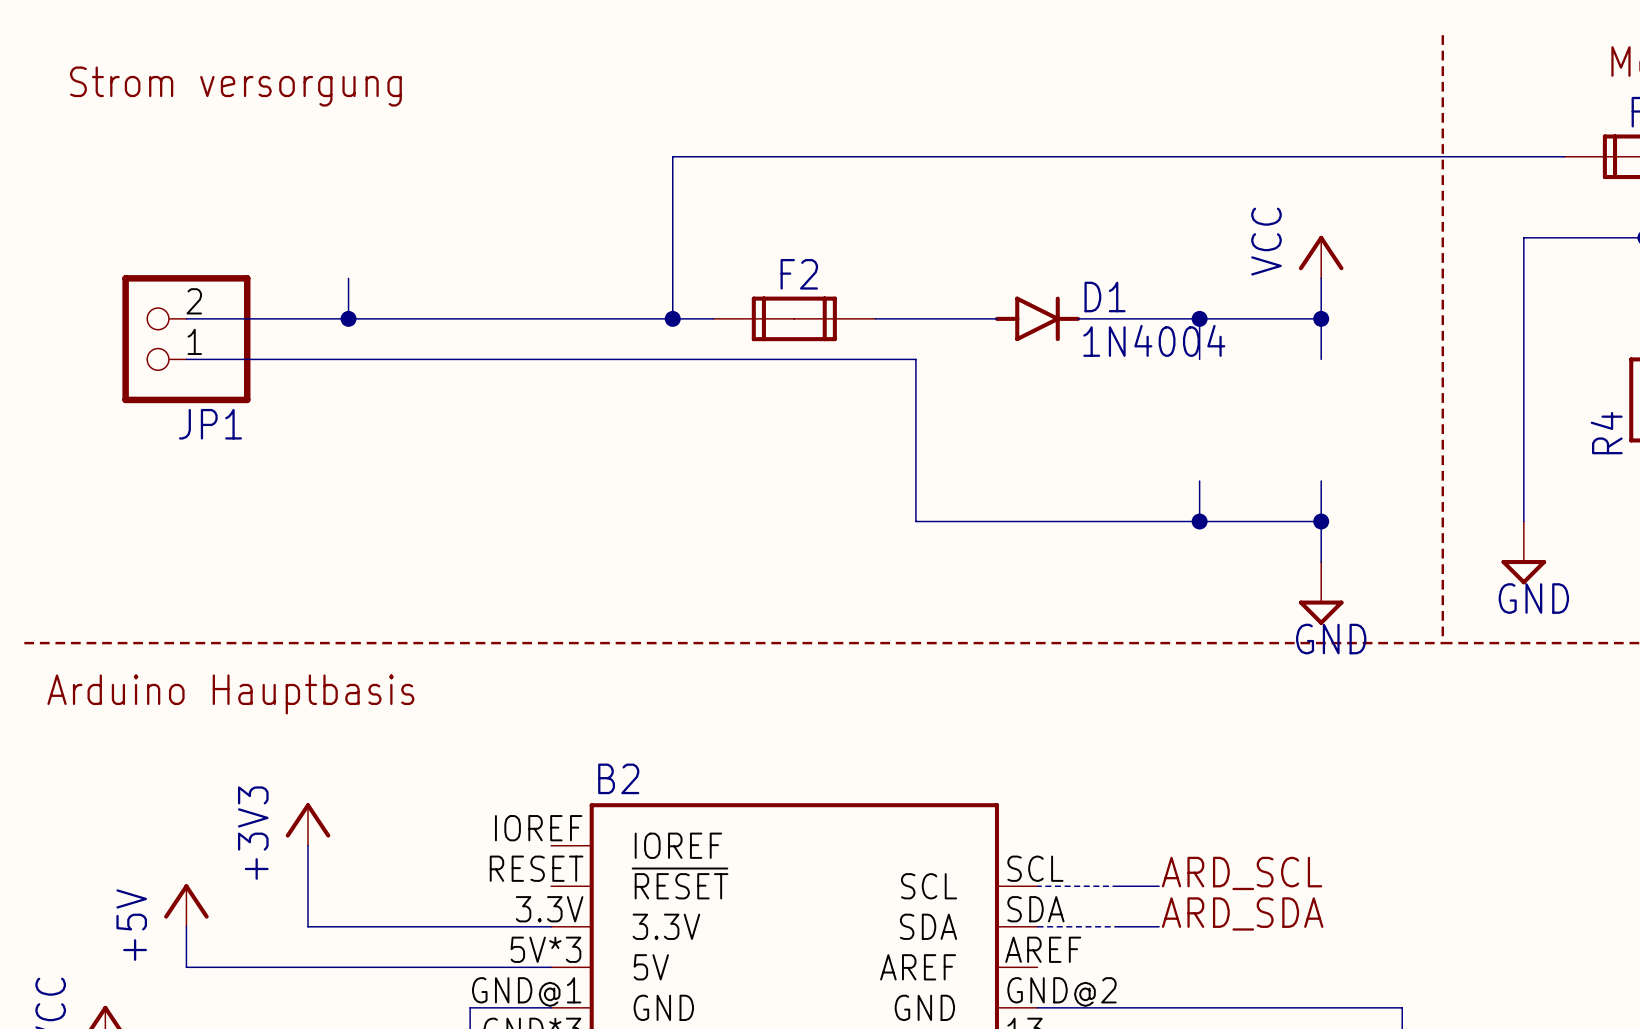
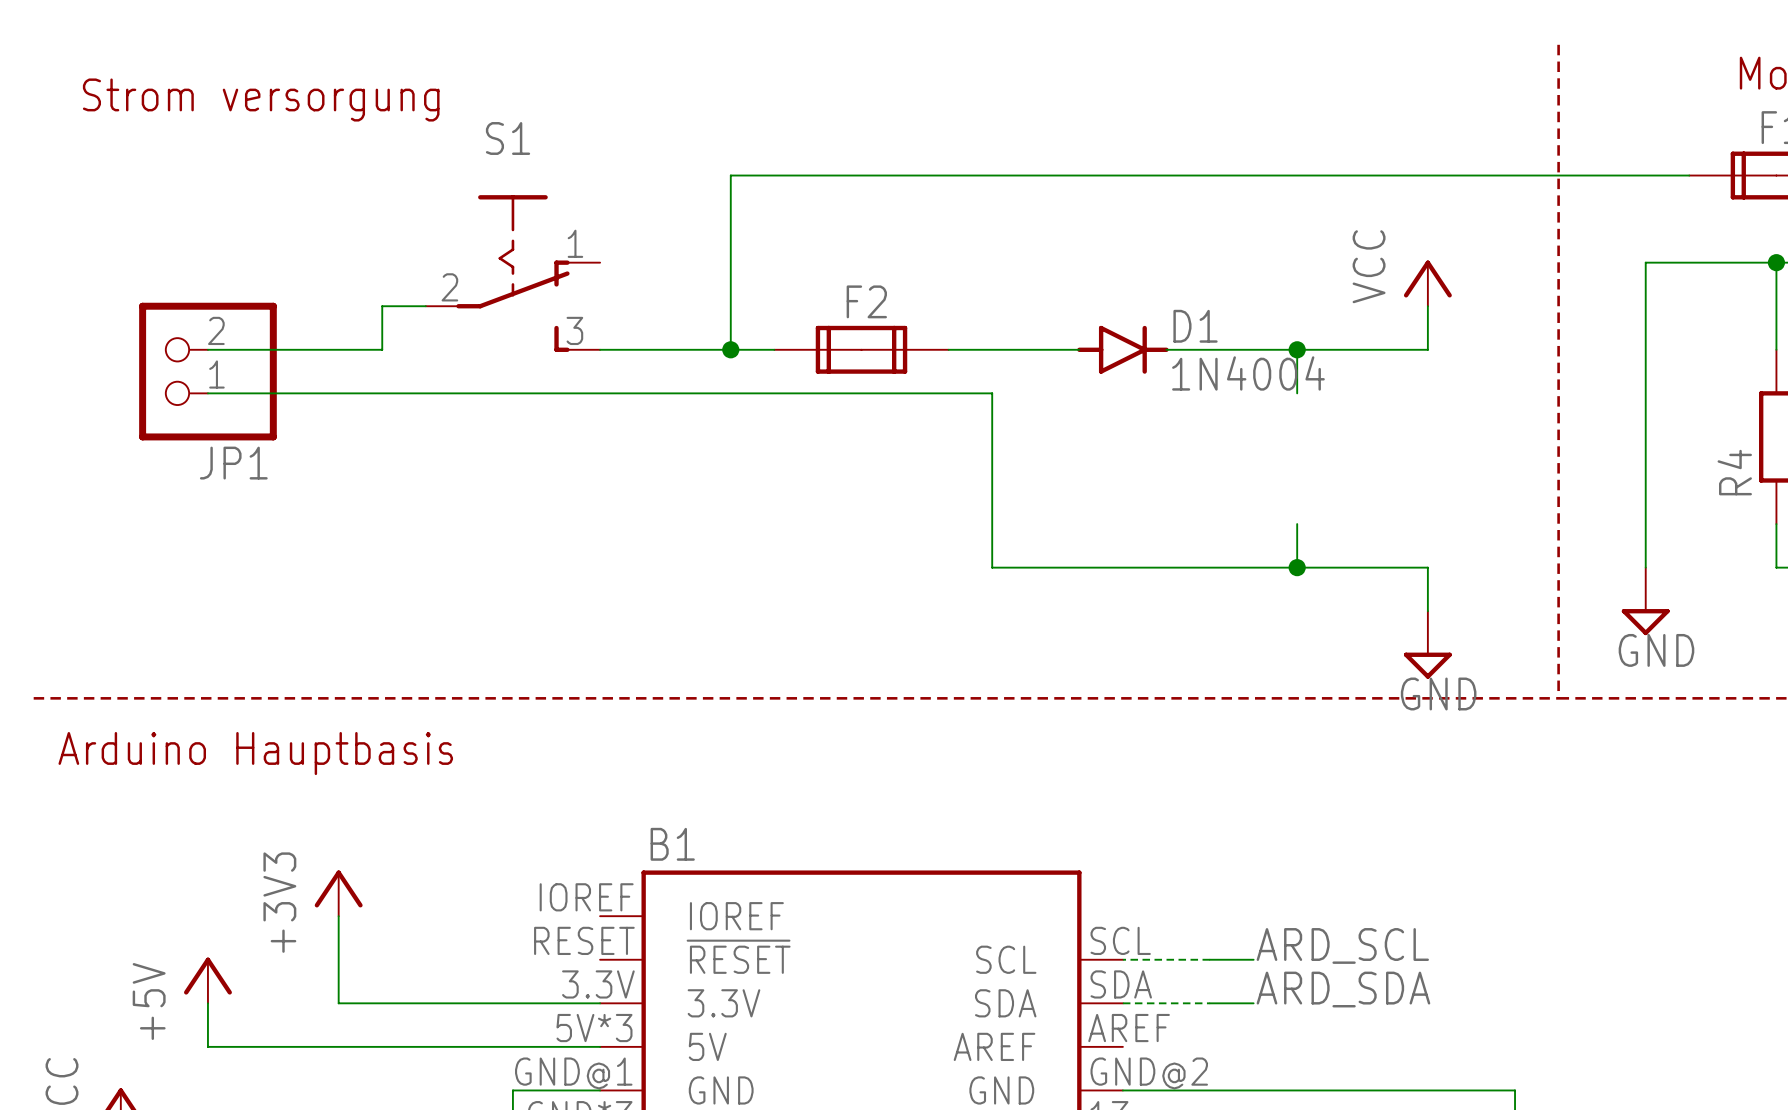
S1: none -> (512, 273)
wire: none -> (382, 306) (425, 306)
wire: (348, 318) (551, 318) -> none
junction: (348, 318) -> none
wire: (1321, 318) (1321, 359) -> none
junction: (1321, 318) -> none
wire: (1321, 480) (1321, 521) -> none
junction: (1321, 521) -> none
B2 name: B2 (618, 778) -> B1 (672, 844)

